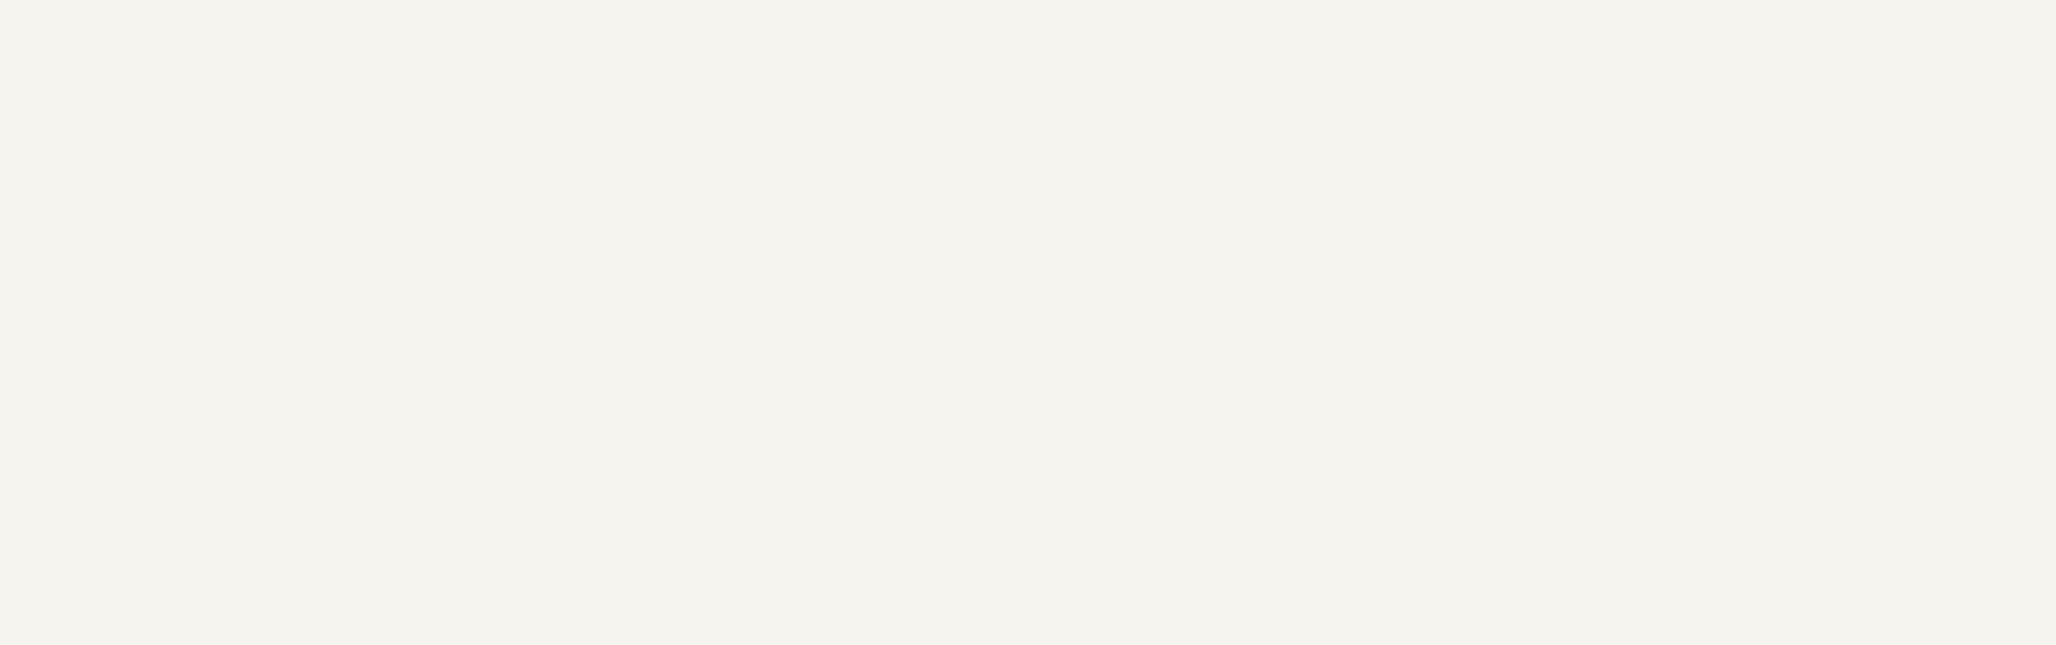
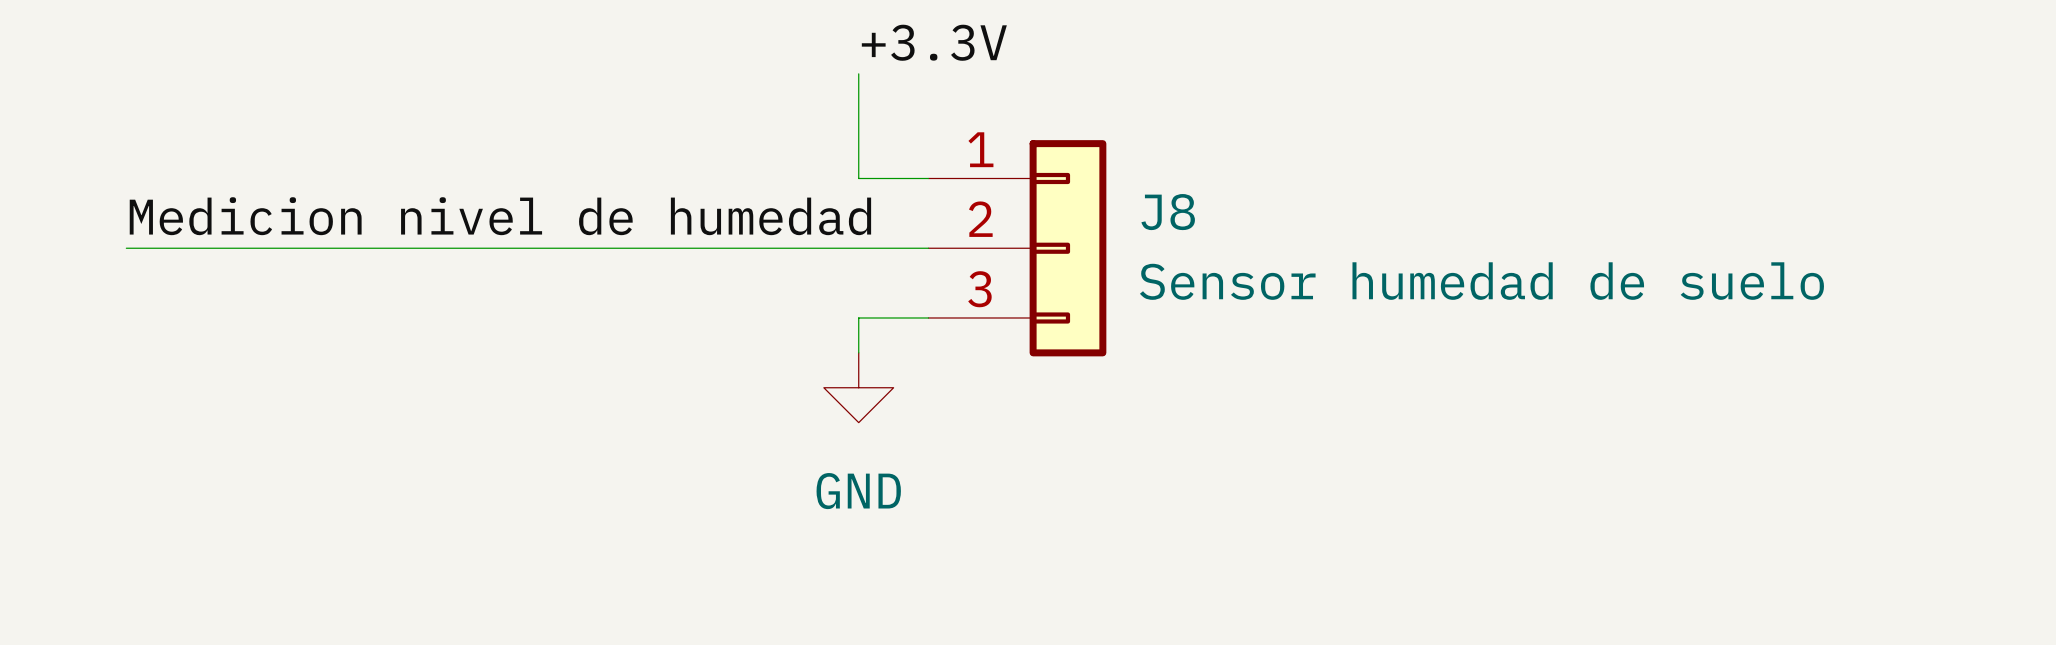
label: none -> +3.3V (934, 42)
wire: none -> (858, 73) (858, 178) (928, 178)
label: none -> Medicion nivel de humedad (500, 216)
wire: none -> (126, 248) (928, 248)
J8: none -> Sensor humedad de suelo (1017, 248)
wire: none -> (928, 317) (858, 317) (858, 352)
power symbol: none -> GND (858, 387)

